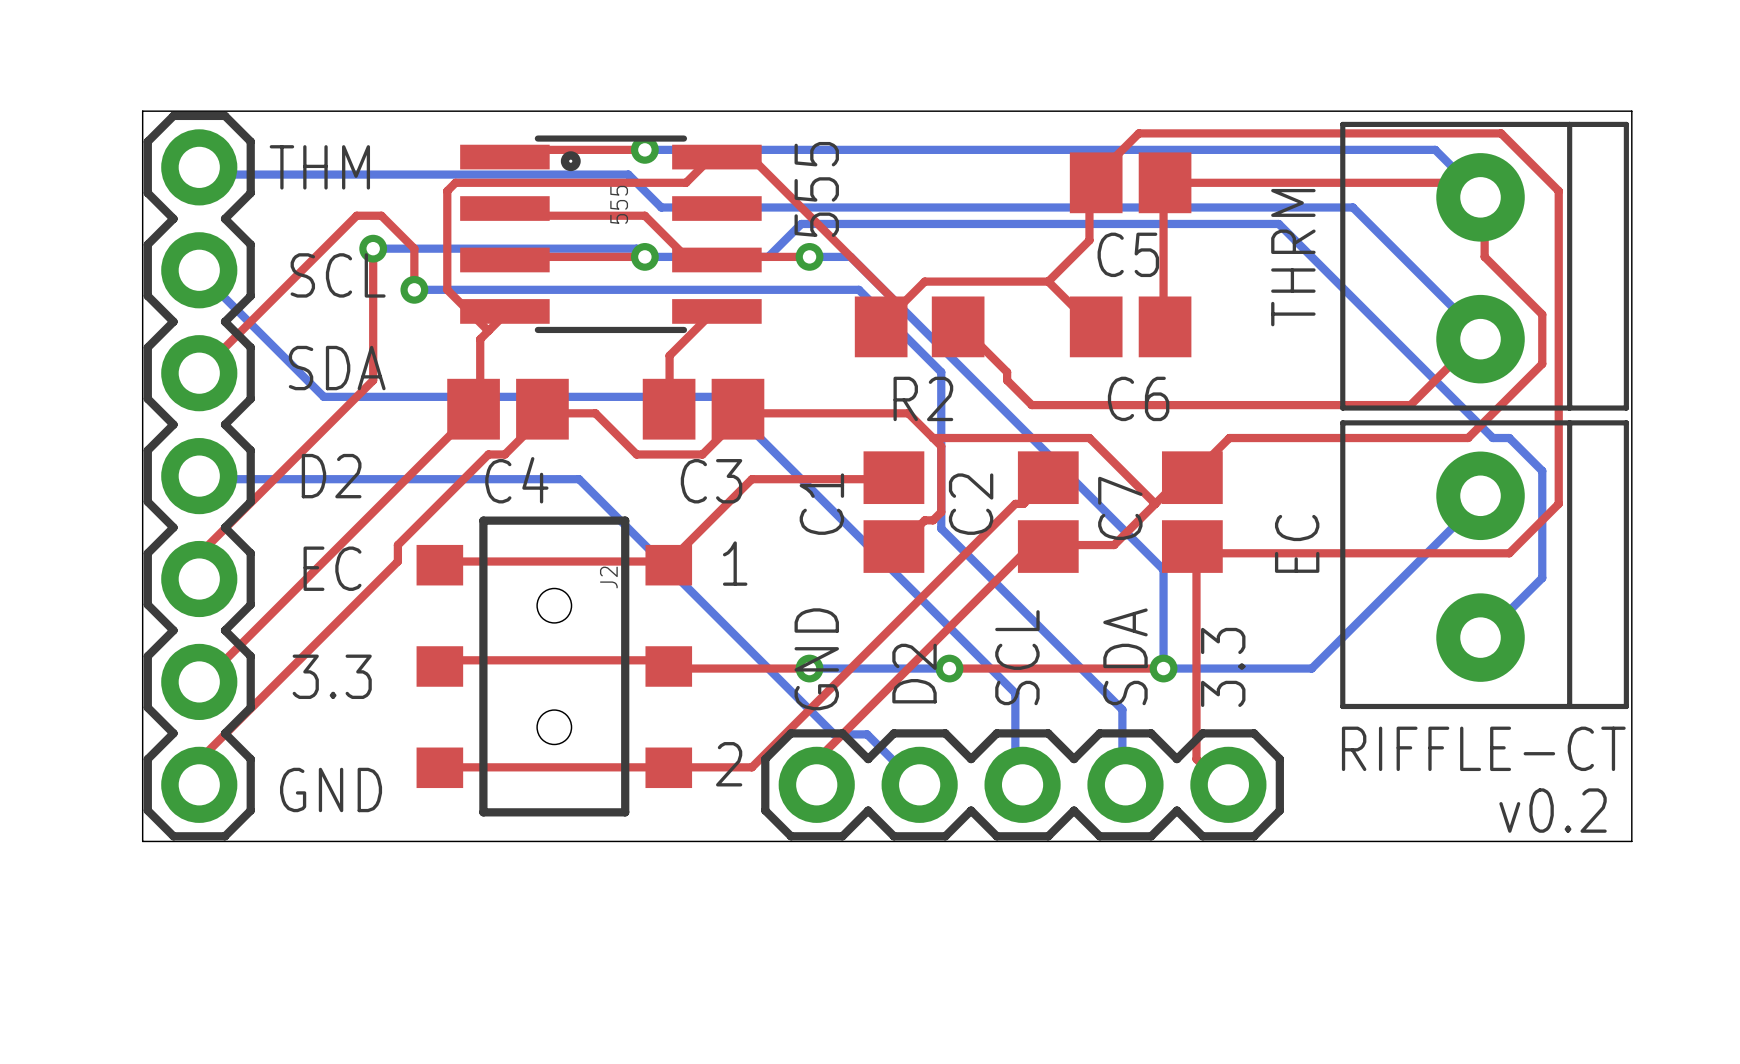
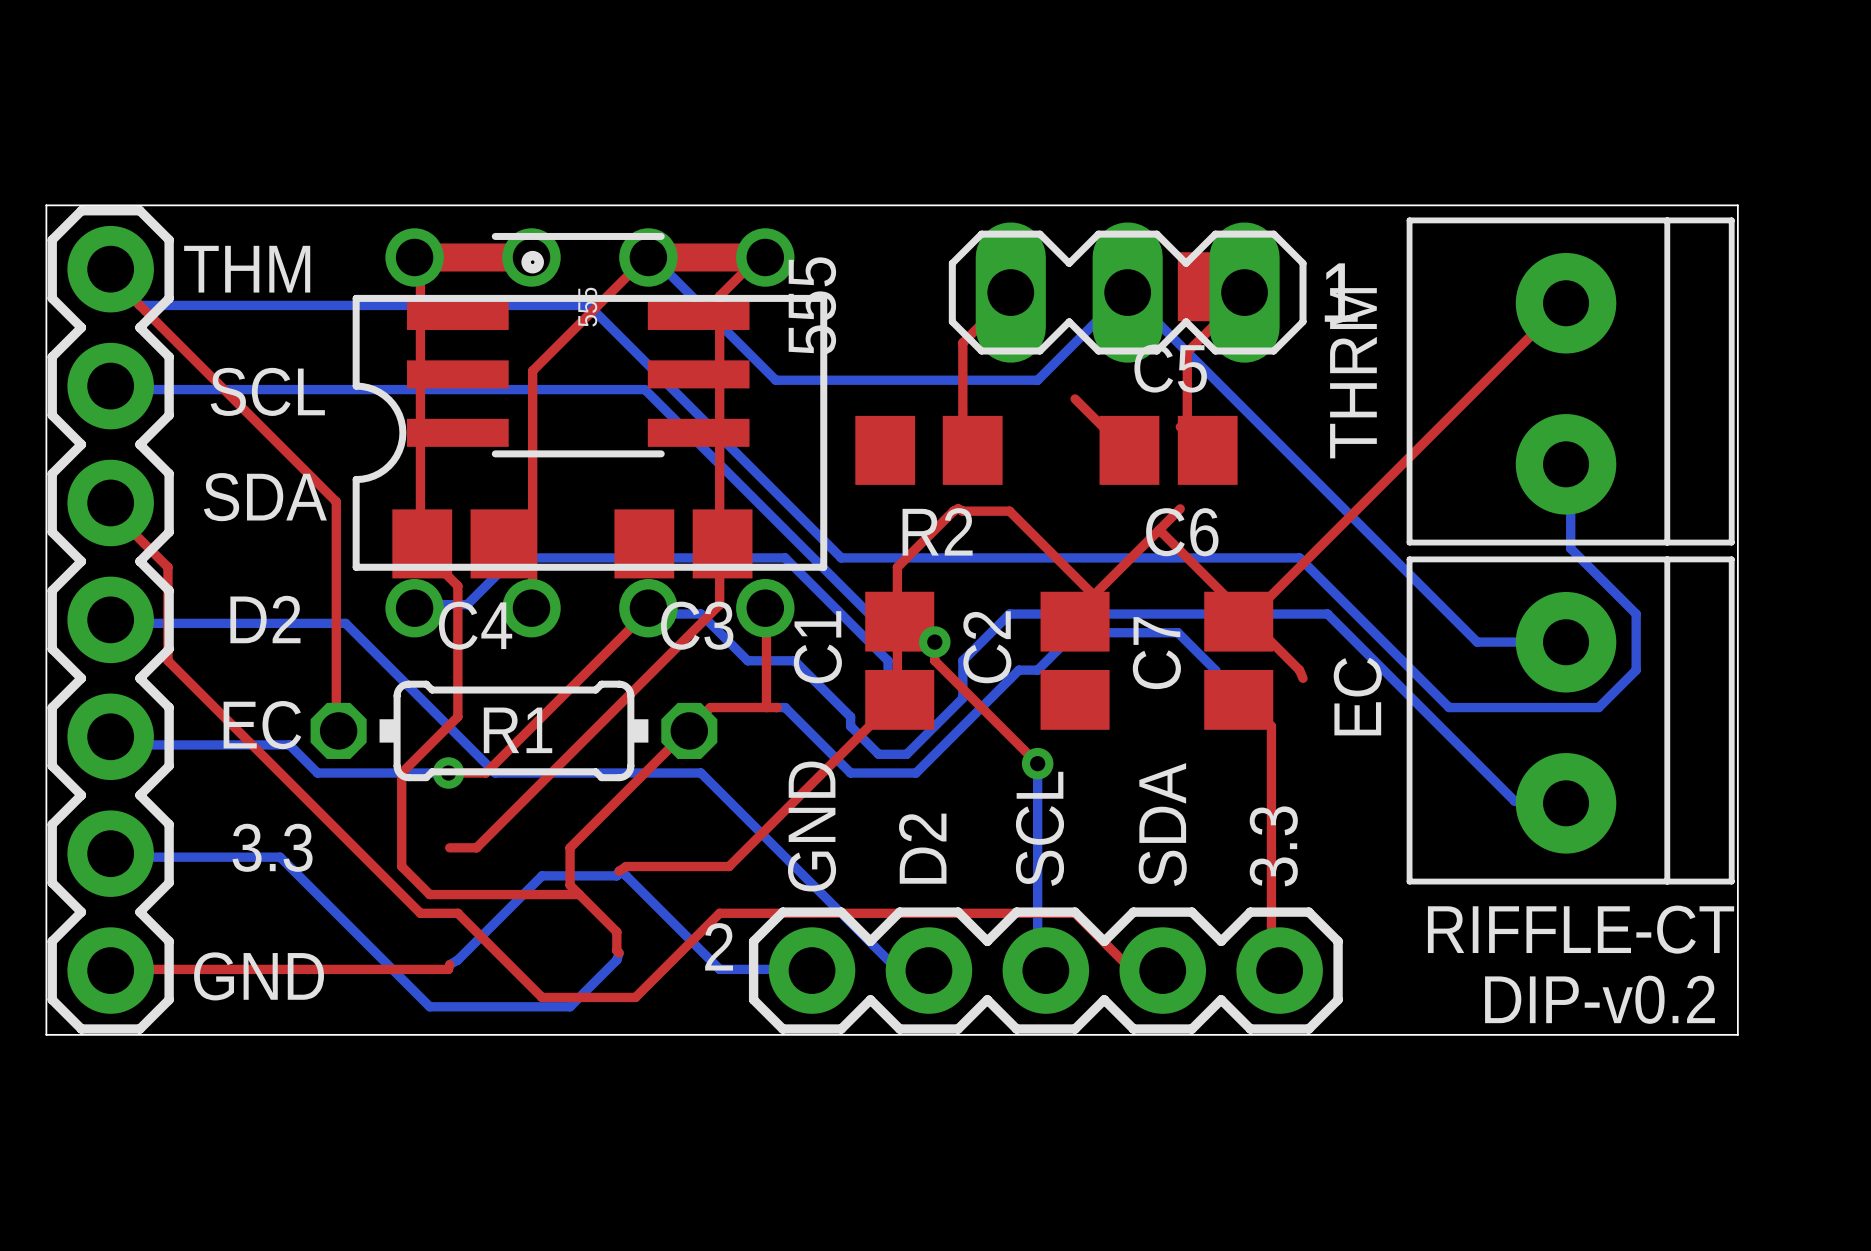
top track: (644, 149) (504, 149) (504, 158) -> none
bottom track: (644, 149) (1435, 149) (1480, 197) -> none
via: (644, 149) -> none
top track: none -> (414, 257) (420, 258) (420, 548) (457, 585) (457, 716) (401, 773) (401, 866) (429, 894) (579, 894)
top track: none -> (648, 257) (644, 258) (532, 370) (531, 608)
top track: none -> (765, 257) (757, 258) (719, 296) (719, 604) (476, 847) (449, 847)
bottom track: (200, 174) (628, 174) (661, 207) (1352, 207) (1476, 330) (1480, 339) -> (111, 277) (139, 305) (588, 305) (841, 557) (1299, 557) (1449, 707) (1598, 707) (1636, 670)
top track: (1089, 182) (1089, 240) (1048, 281) (924, 281) (881, 326) (900, 306) (751, 158) (710, 158) (686, 182) (455, 182) (447, 191) (447, 289) (488, 330) -> none
top track: (1089, 182) (1138, 133) (1501, 133) (1558, 191) (1558, 503) (1509, 553) (1196, 553) -> none
top track: none -> (1010, 292) (1009, 296) (962, 342) (962, 426) (958, 426)
part: none -> (1127, 292)
top track: none -> (1244, 292) (1243, 296) (1187, 352) (1187, 426) (1180, 426)
top track: none -> (1566, 303) (1561, 305) (1252, 614) (1243, 614)
top track: (504, 208) (504, 215) (644, 215) (686, 256) (710, 256) (716, 259) (718, 256) (809, 256) -> none
top track: (373, 248) (373, 380) (200, 553) (199, 579) -> none
bottom track: (373, 248) (636, 248) (644, 256) (768, 256) (801, 223) (1278, 223) (1492, 438) (1509, 438) -> (1566, 464) (1570, 464) (1570, 548) (1598, 576)
via: (373, 248) -> none
top track: (644, 256) (504, 256) (504, 259) -> none
via: (644, 256) -> none
bottom track: (809, 256) (850, 256) (1163, 569) (1163, 668) (1311, 668) (1476, 503) (1480, 495) -> (648, 257) (654, 258) (775, 380) (1037, 380) (1121, 296) (1127, 292) (1477, 642) (1566, 642)
via: (809, 256) -> none
bottom track: (200, 273) (323, 396) (718, 396) (1015, 693) -> (111, 389) (644, 389) (897, 642) (934, 642)
top track: (414, 289) (414, 248) (381, 215) (356, 215) (199, 373) -> (1162, 970) (1131, 969) (1075, 913) (719, 913) (635, 997) (542, 997) (457, 913) (420, 913) (167, 660) (167, 567) (111, 511) (110, 502)
bottom track: (414, 289) (858, 289) (941, 372) (941, 528) (1122, 709) (1122, 783) (1125, 784) -> none
via: (414, 289) -> none
top track: (504, 311) (504, 314) (480, 339) (480, 405) (473, 409) (471, 413) (200, 685) (199, 681) -> none
part: none -> (589, 432)
top track: (716, 311) (710, 314) (669, 355) (669, 409) -> none
top track: (958, 326) (965, 330) (1007, 372) (1007, 380) (1031, 405) (1410, 405) (1476, 339) (1480, 339) -> none
top track: (1165, 326) (1163, 182) (1468, 182) (1480, 197) (1484, 199) (1484, 256) (1542, 314) (1542, 363) (1468, 438) (1229, 438) (1196, 470) (1192, 477) (1188, 470) (1114, 545) (1048, 545) (1048, 553) (1023, 553) (817, 759) (816, 784) -> none
top track: none -> (1180, 508) (1093, 595) (1009, 511) (962, 511) (958, 508) (953, 511) (897, 567) (897, 707) (888, 707) (729, 866) (626, 866) (619, 871)
top track: none -> (1159, 529) (1299, 670) (1303, 678)
top track: (546, 413) (504, 454) (488, 454) (397, 545) -> (110, 269) (111, 277) (336, 501) (336, 698)
top track: (546, 413) (595, 413) (636, 454) (702, 454) (743, 413) -> none
top track: (743, 413) (908, 413) (941, 446) (941, 512) (933, 520) (924, 520) (900, 545) (893, 546) -> none
top track: (933, 438) (1089, 438) (1155, 503) -> none
bottom track: none -> (414, 608) (420, 604) (467, 604) (513, 557) (785, 557) (888, 660) (888, 707) (893, 707)
top track: none -> (648, 608) (644, 614) (485, 773) (448, 773)
top track: none -> (765, 608) (766, 707)
top track: (893, 477) (751, 479) (669, 561) (668, 565) (661, 561) (447, 561) (439, 565) -> none
top track: (1048, 477) (1023, 503) (1015, 503) (751, 767) (439, 767) -> none
bottom track: (406, 479) (579, 479) (834, 734) (867, 734) (916, 783) -> (345, 623) (495, 773) (701, 773) (897, 969) (925, 969)
top track: none -> (934, 642) (934, 660) (1037, 763)
via: none -> (934, 642)
bottom track: (1542, 520) (1542, 577) (1480, 637) -> (648, 608) (654, 614) (701, 614) (747, 660) (794, 660) (850, 716) (850, 726) (878, 754) (906, 754) (962, 698) (962, 660) (1009, 614) (1327, 614) (1514, 801) (1561, 801) (1566, 803)
bottom track: none -> (1221, 678) (1177, 632) (1075, 632) (1037, 670) (1018, 670) (916, 773) (850, 773) (785, 707) (776, 707)
top track: none -> (776, 707) (710, 707) (689, 730) (682, 735) (570, 847) (570, 885) (616, 931) (616, 950) (619, 953)
top track: (1196, 553) (1196, 759) (1221, 783) -> (1221, 678) (1224, 679) (1271, 726) (1271, 969)
top track: (397, 561) (200, 759) (200, 783) -> (449, 964) (448, 969) (111, 969)
text: 1 (735, 563) -> none
R1: none -> (513, 730)
bottom track: none -> (110, 736) (111, 744) (289, 744) (317, 773) (448, 773)
bottom track: none -> (1037, 763) (1037, 866)
via: none -> (1037, 763)
via: none -> (448, 773)
top track: (439, 666) (447, 660) (661, 660) (669, 668) (809, 668) -> none
J2: (554, 666) -> none
bottom track: (809, 668) (949, 668) -> none
via: (809, 668) -> none
top track: (949, 668) (1163, 668) -> none
via: (949, 668) -> none
via: (1163, 668) -> none
bottom track: none -> (110, 853) (111, 857) (280, 857) (429, 1006) (570, 1006) (616, 960) (619, 953)
bottom track: none -> (449, 964) (457, 960) (542, 875) (616, 875) (619, 871) (626, 875) (719, 969) (812, 970)
text: v0.2 (1553, 810) -> DIP-v0.2 (1599, 999)

